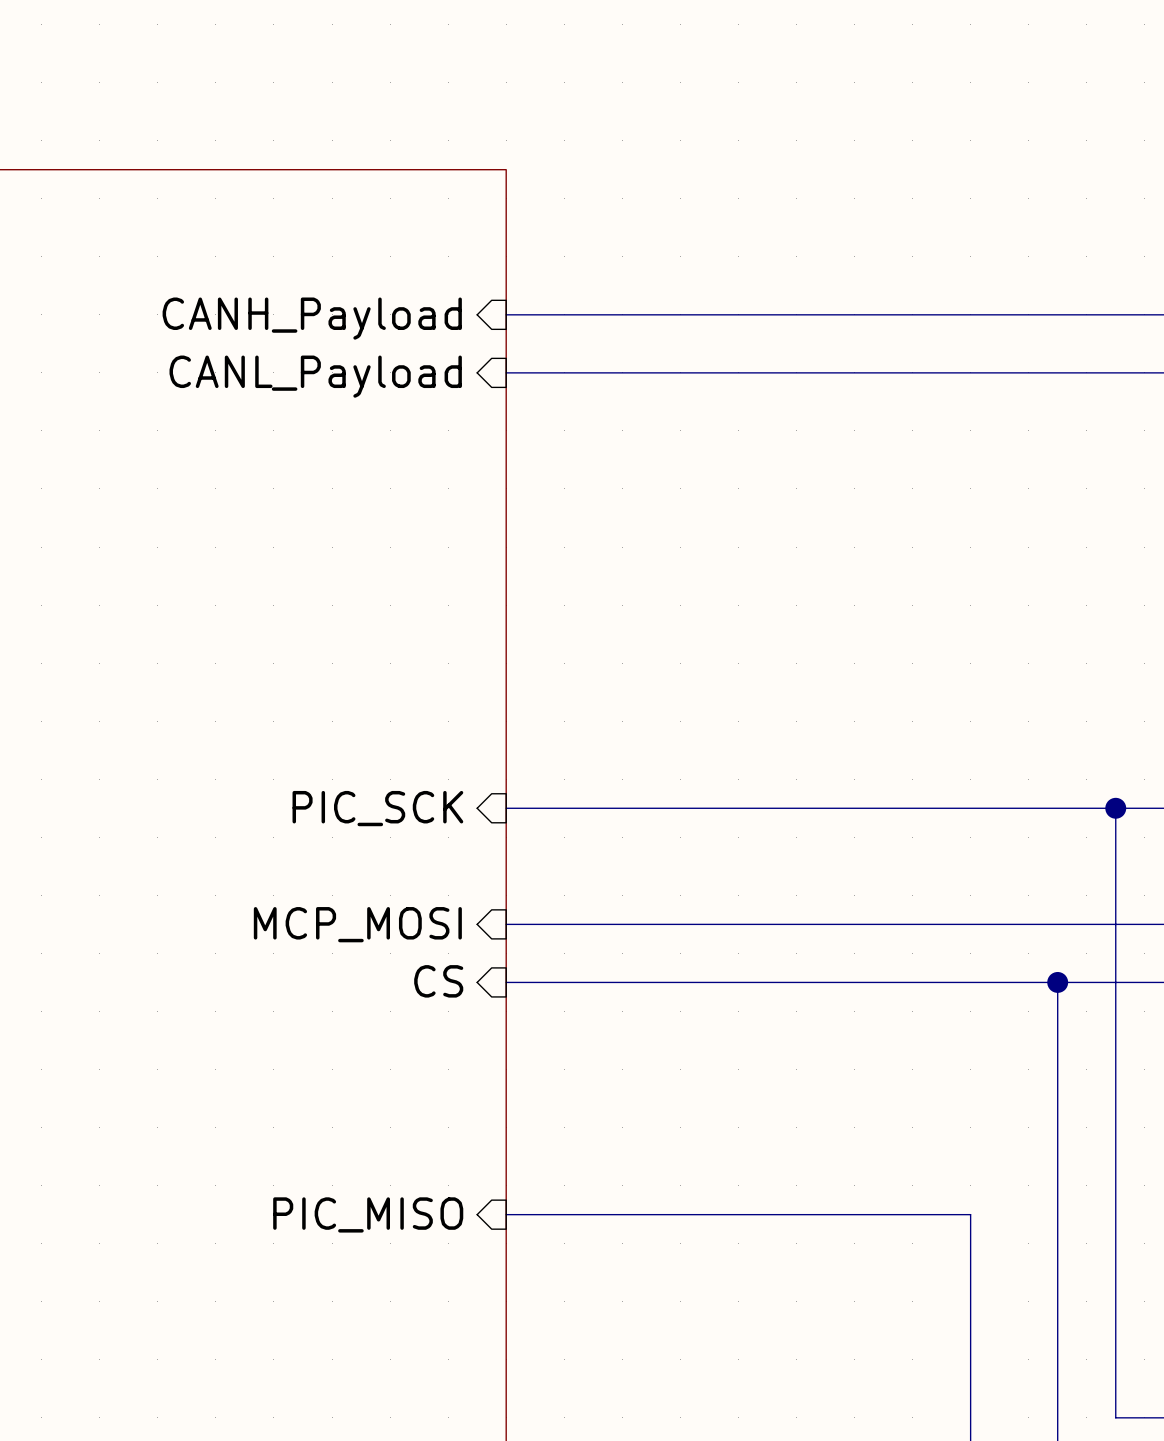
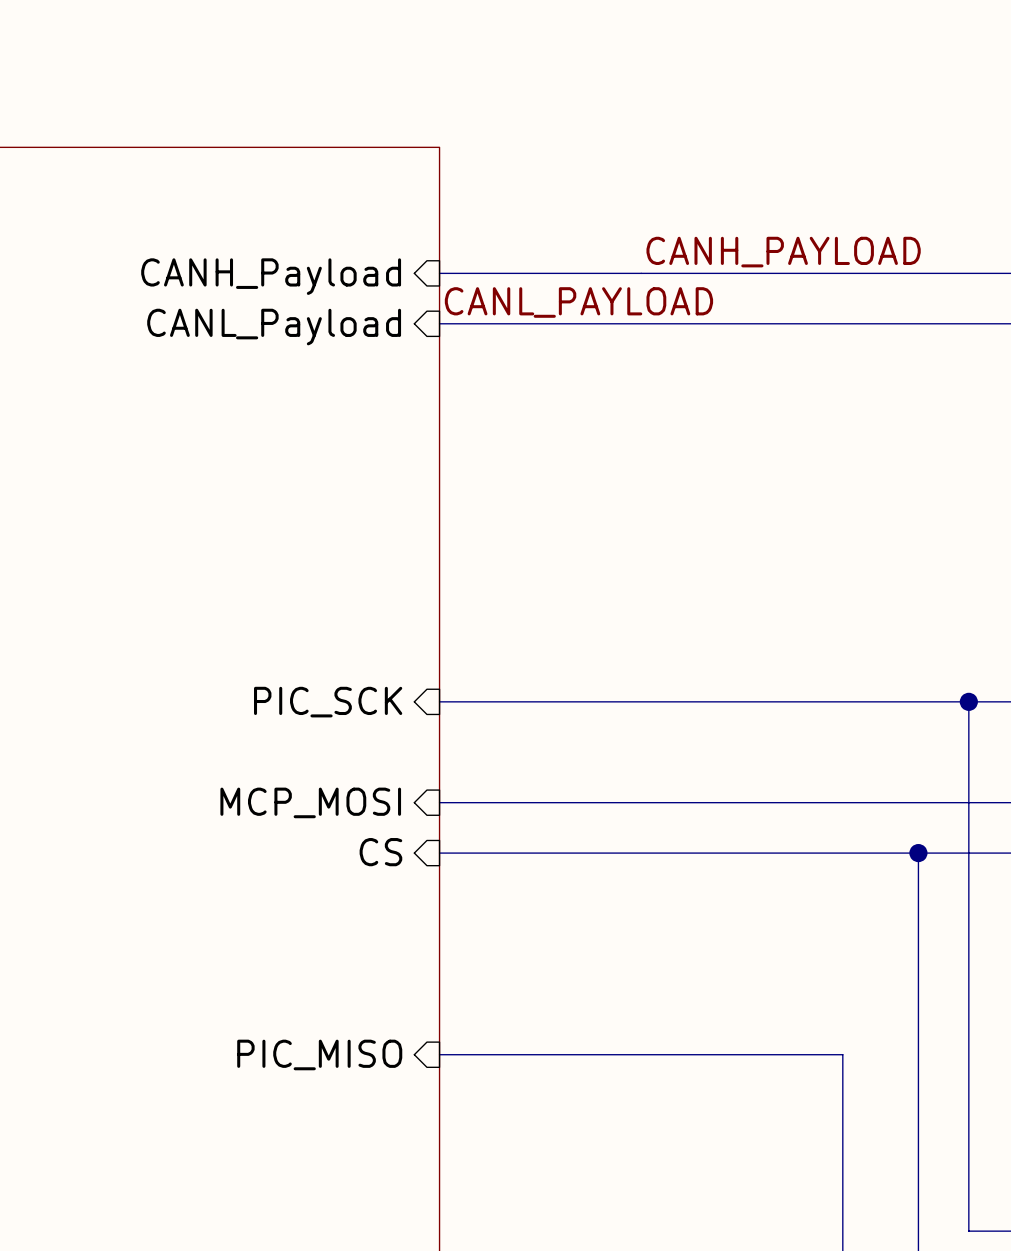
label: none -> CANH_PAYLOAD (783, 252)
label: none -> CANL_PAYLOAD (578, 302)

